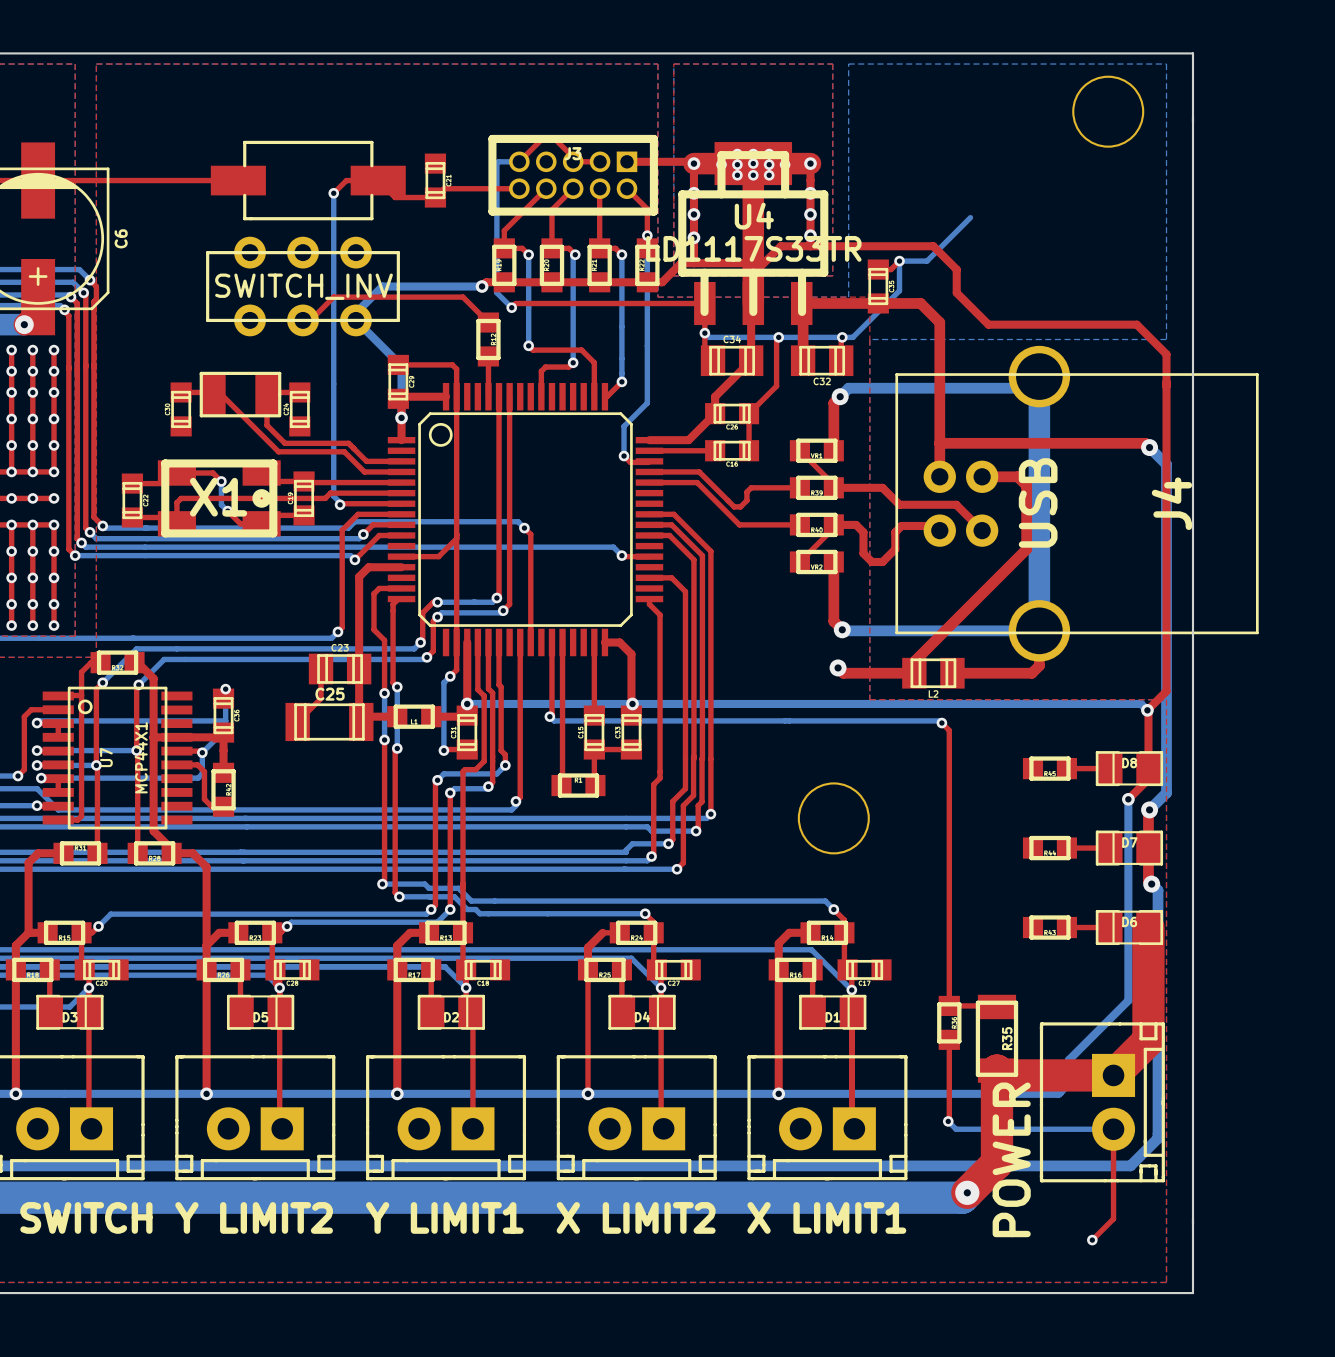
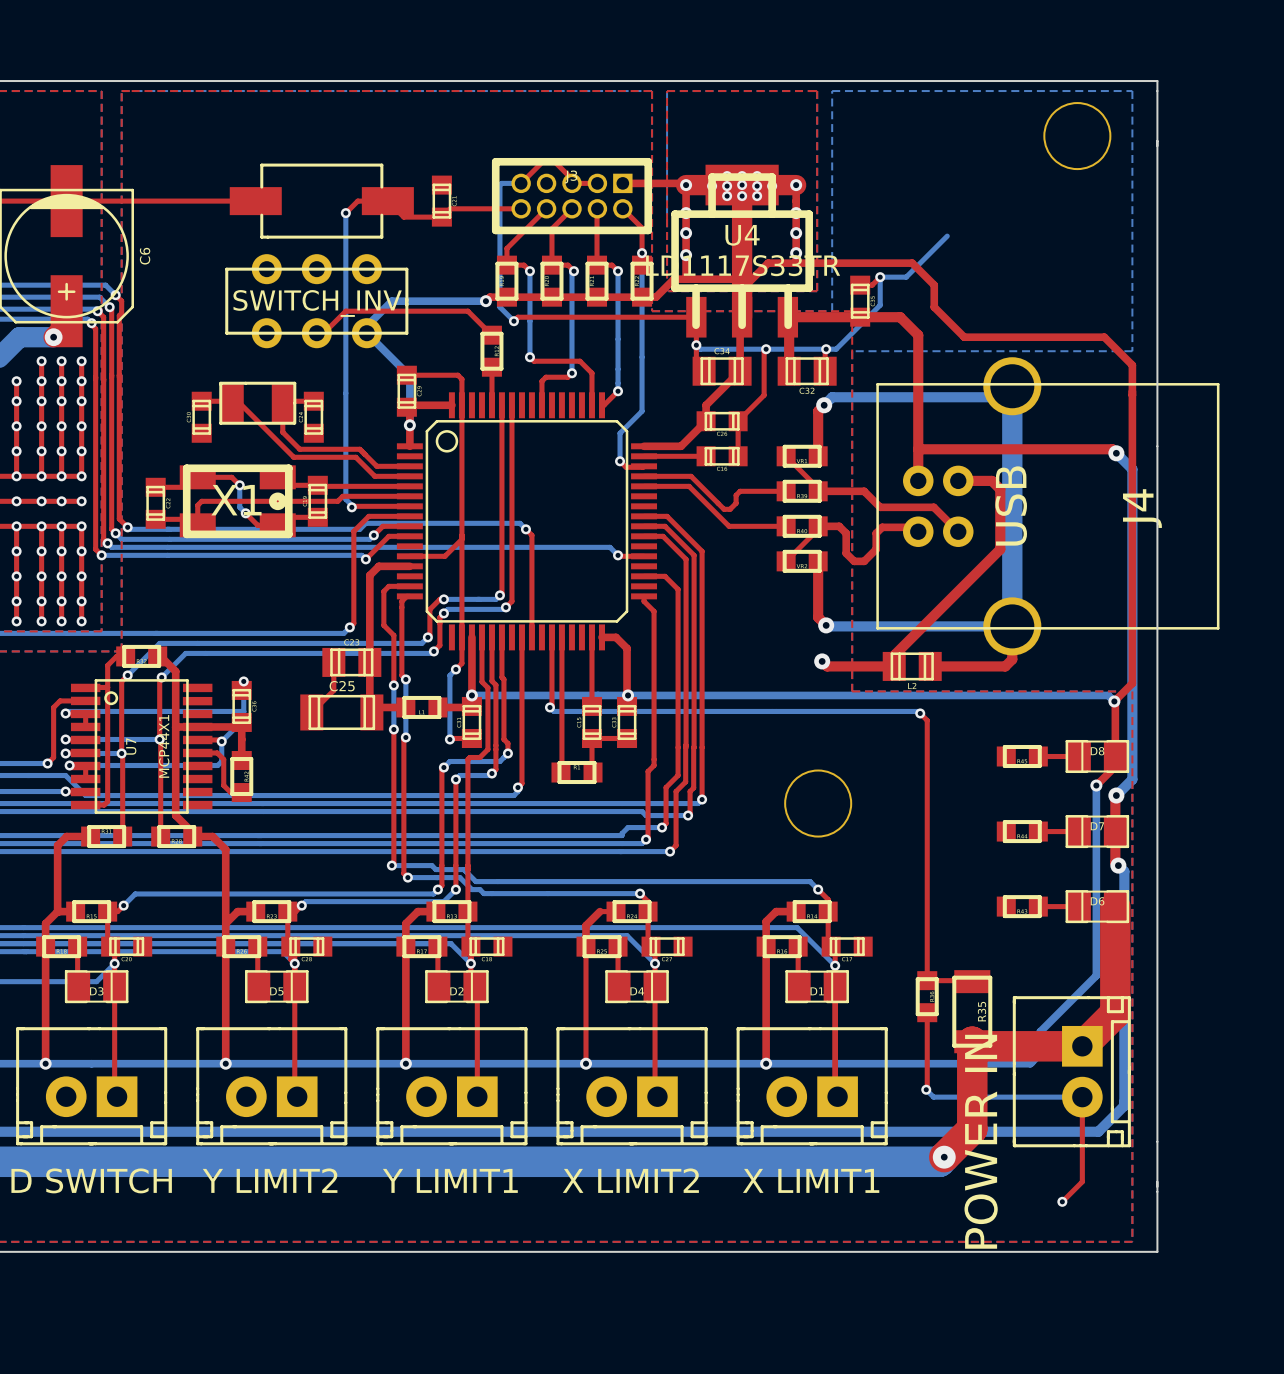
part value: POWER (1011, 1159) -> POWER IN (981, 1141)

